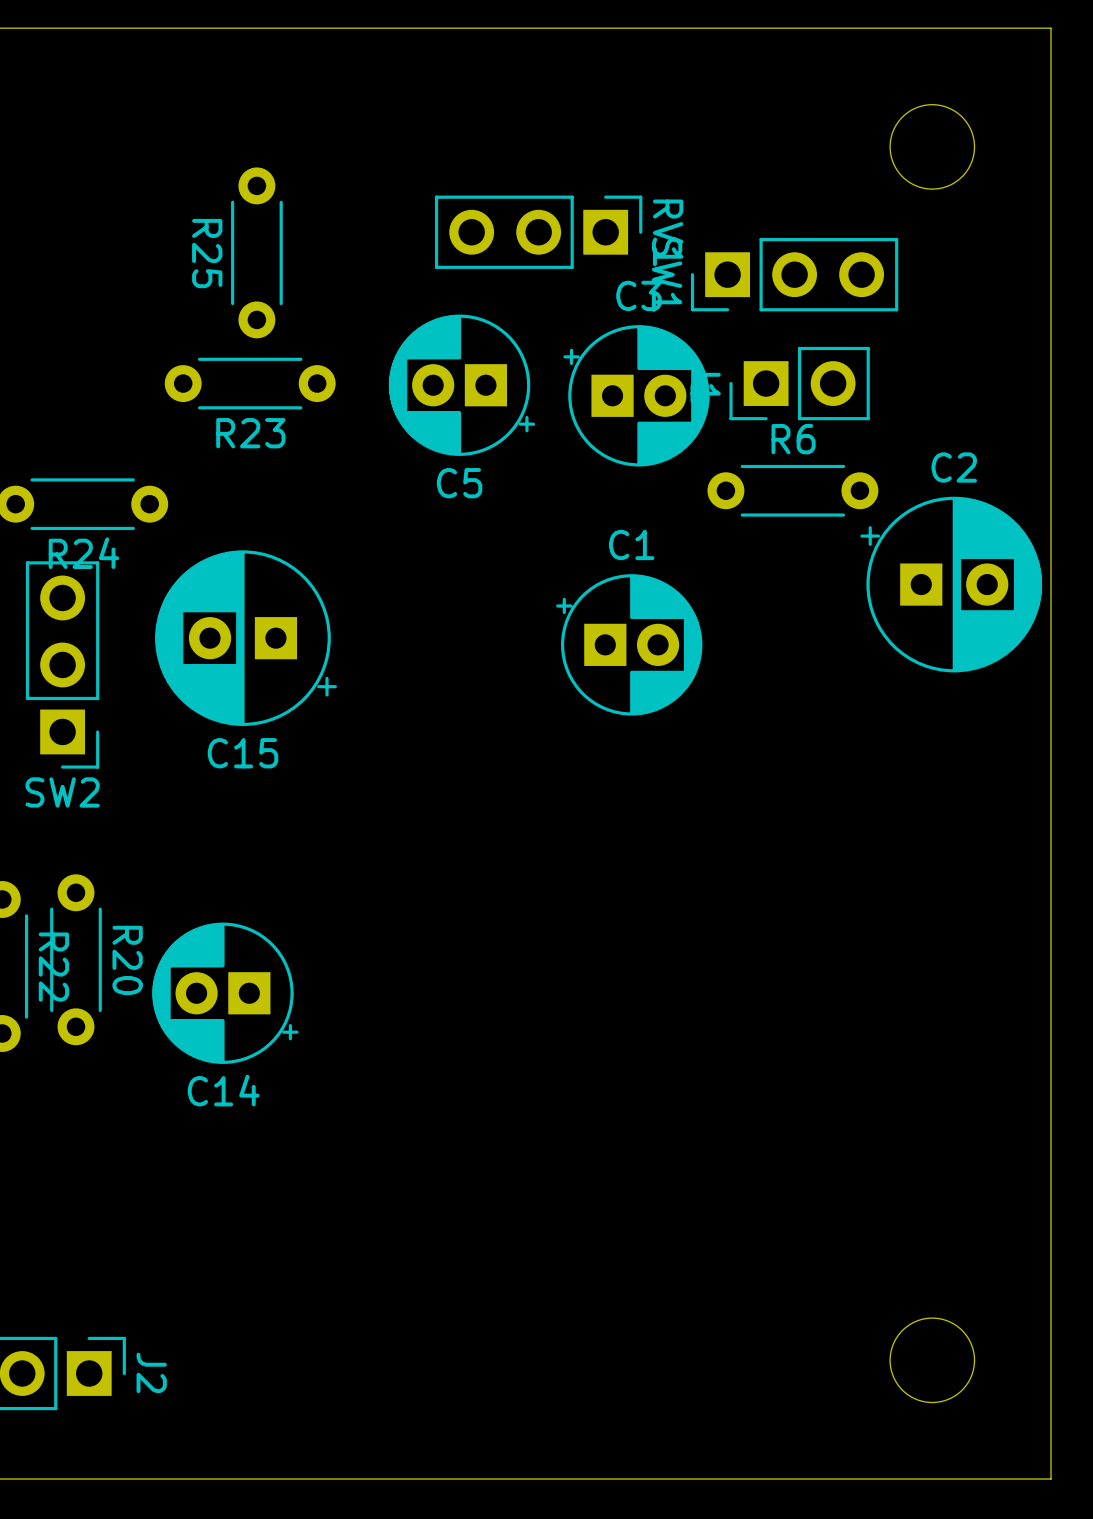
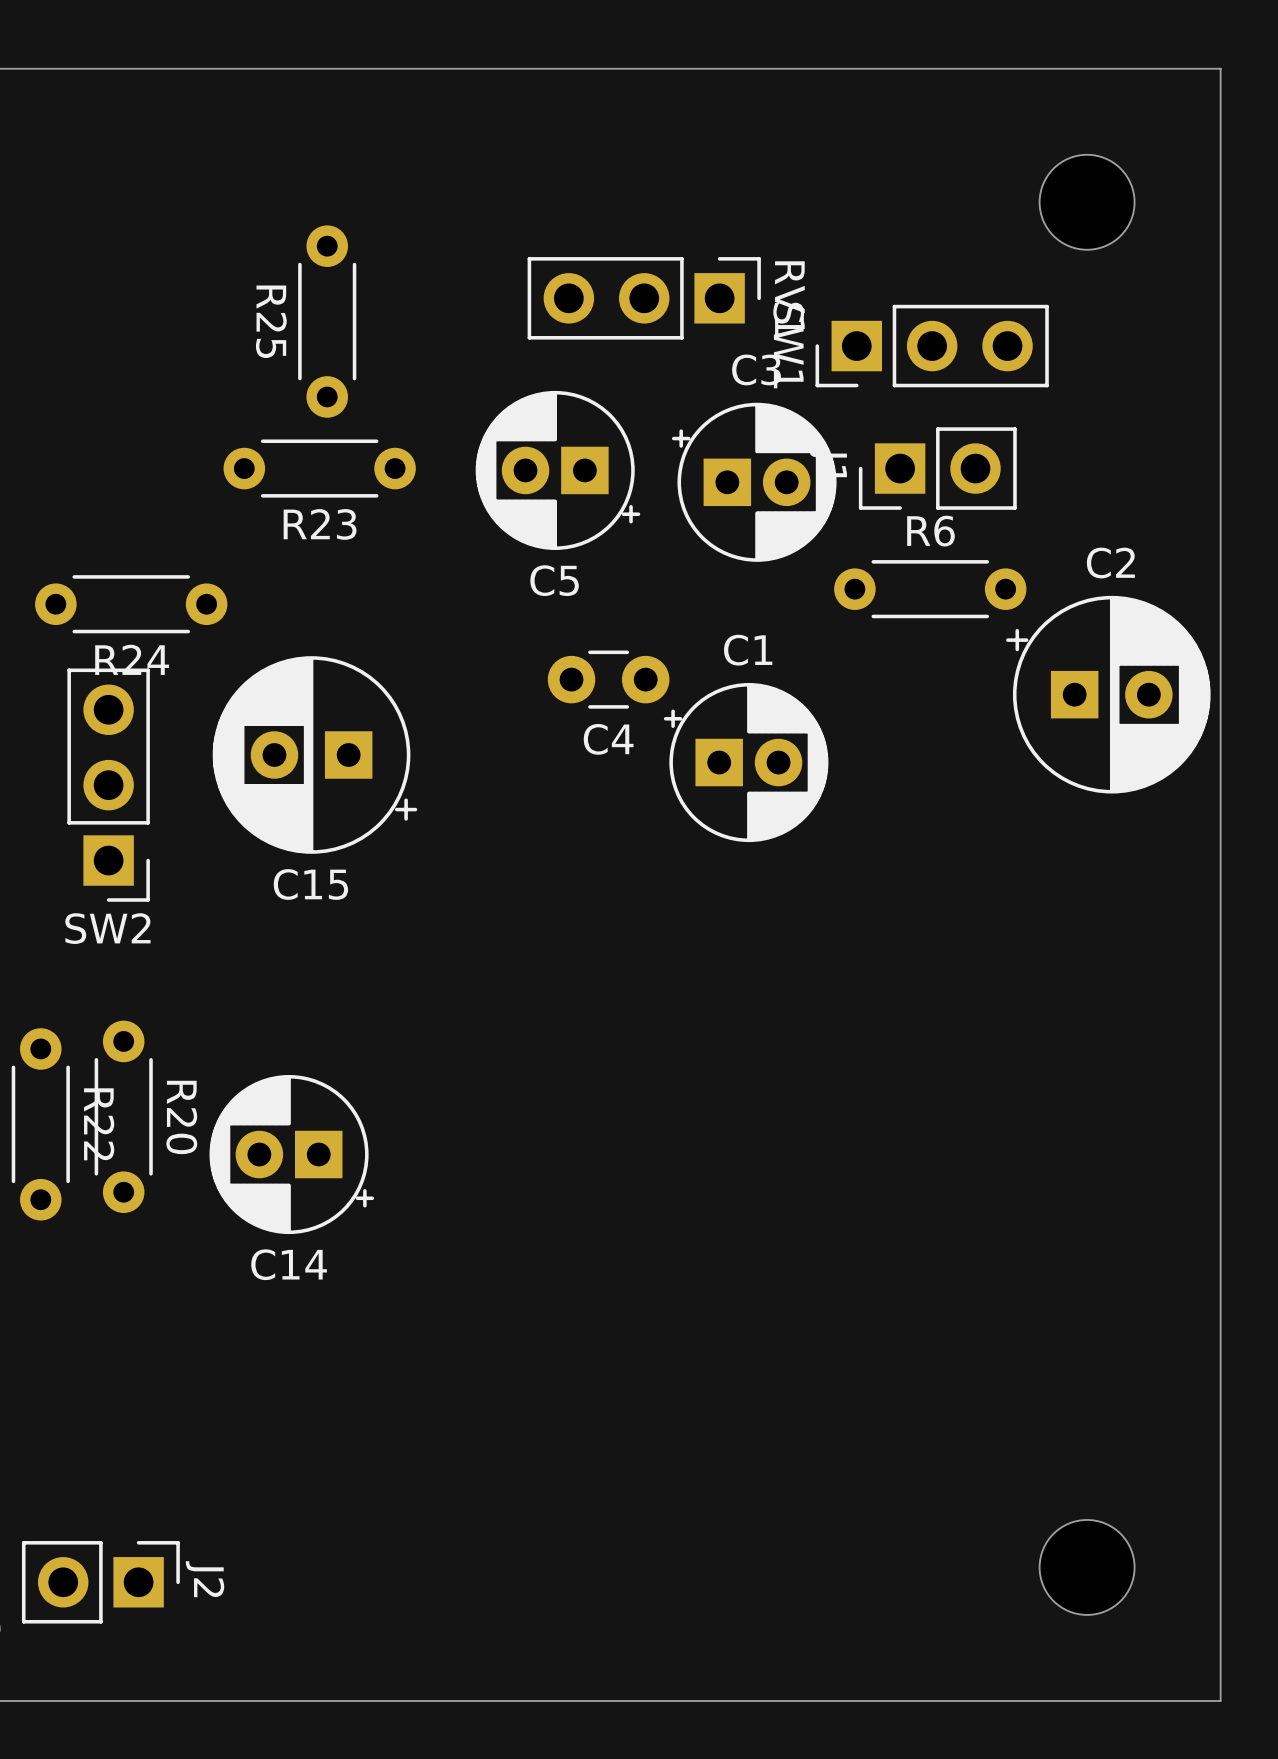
C4: none -> (608, 679)

